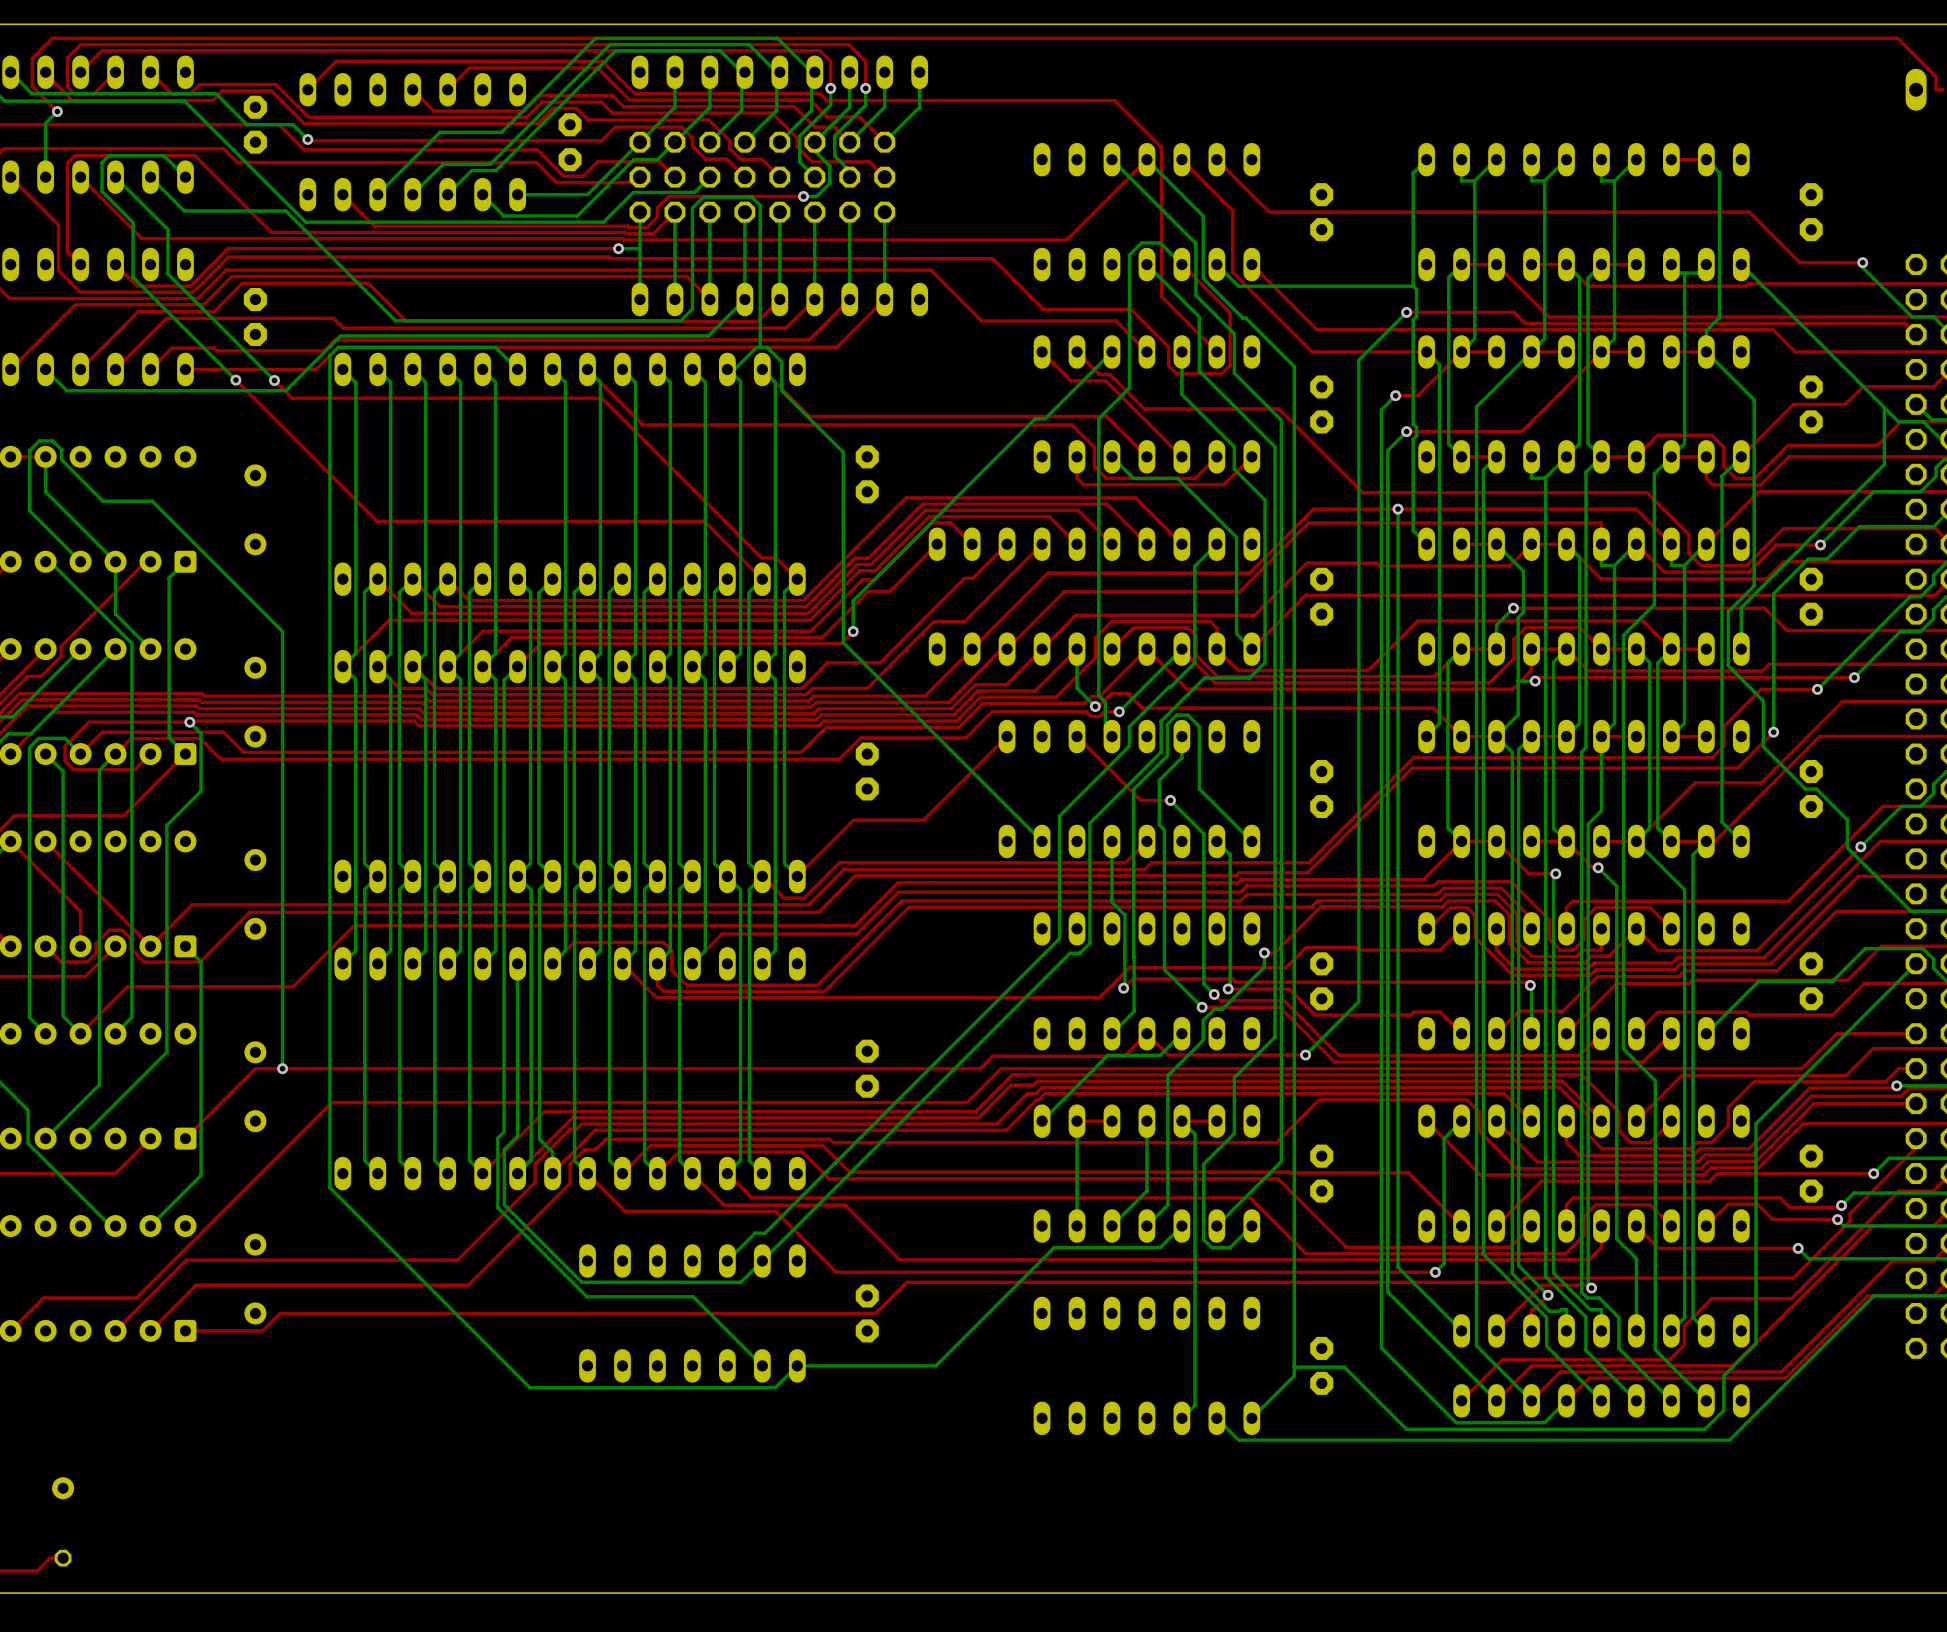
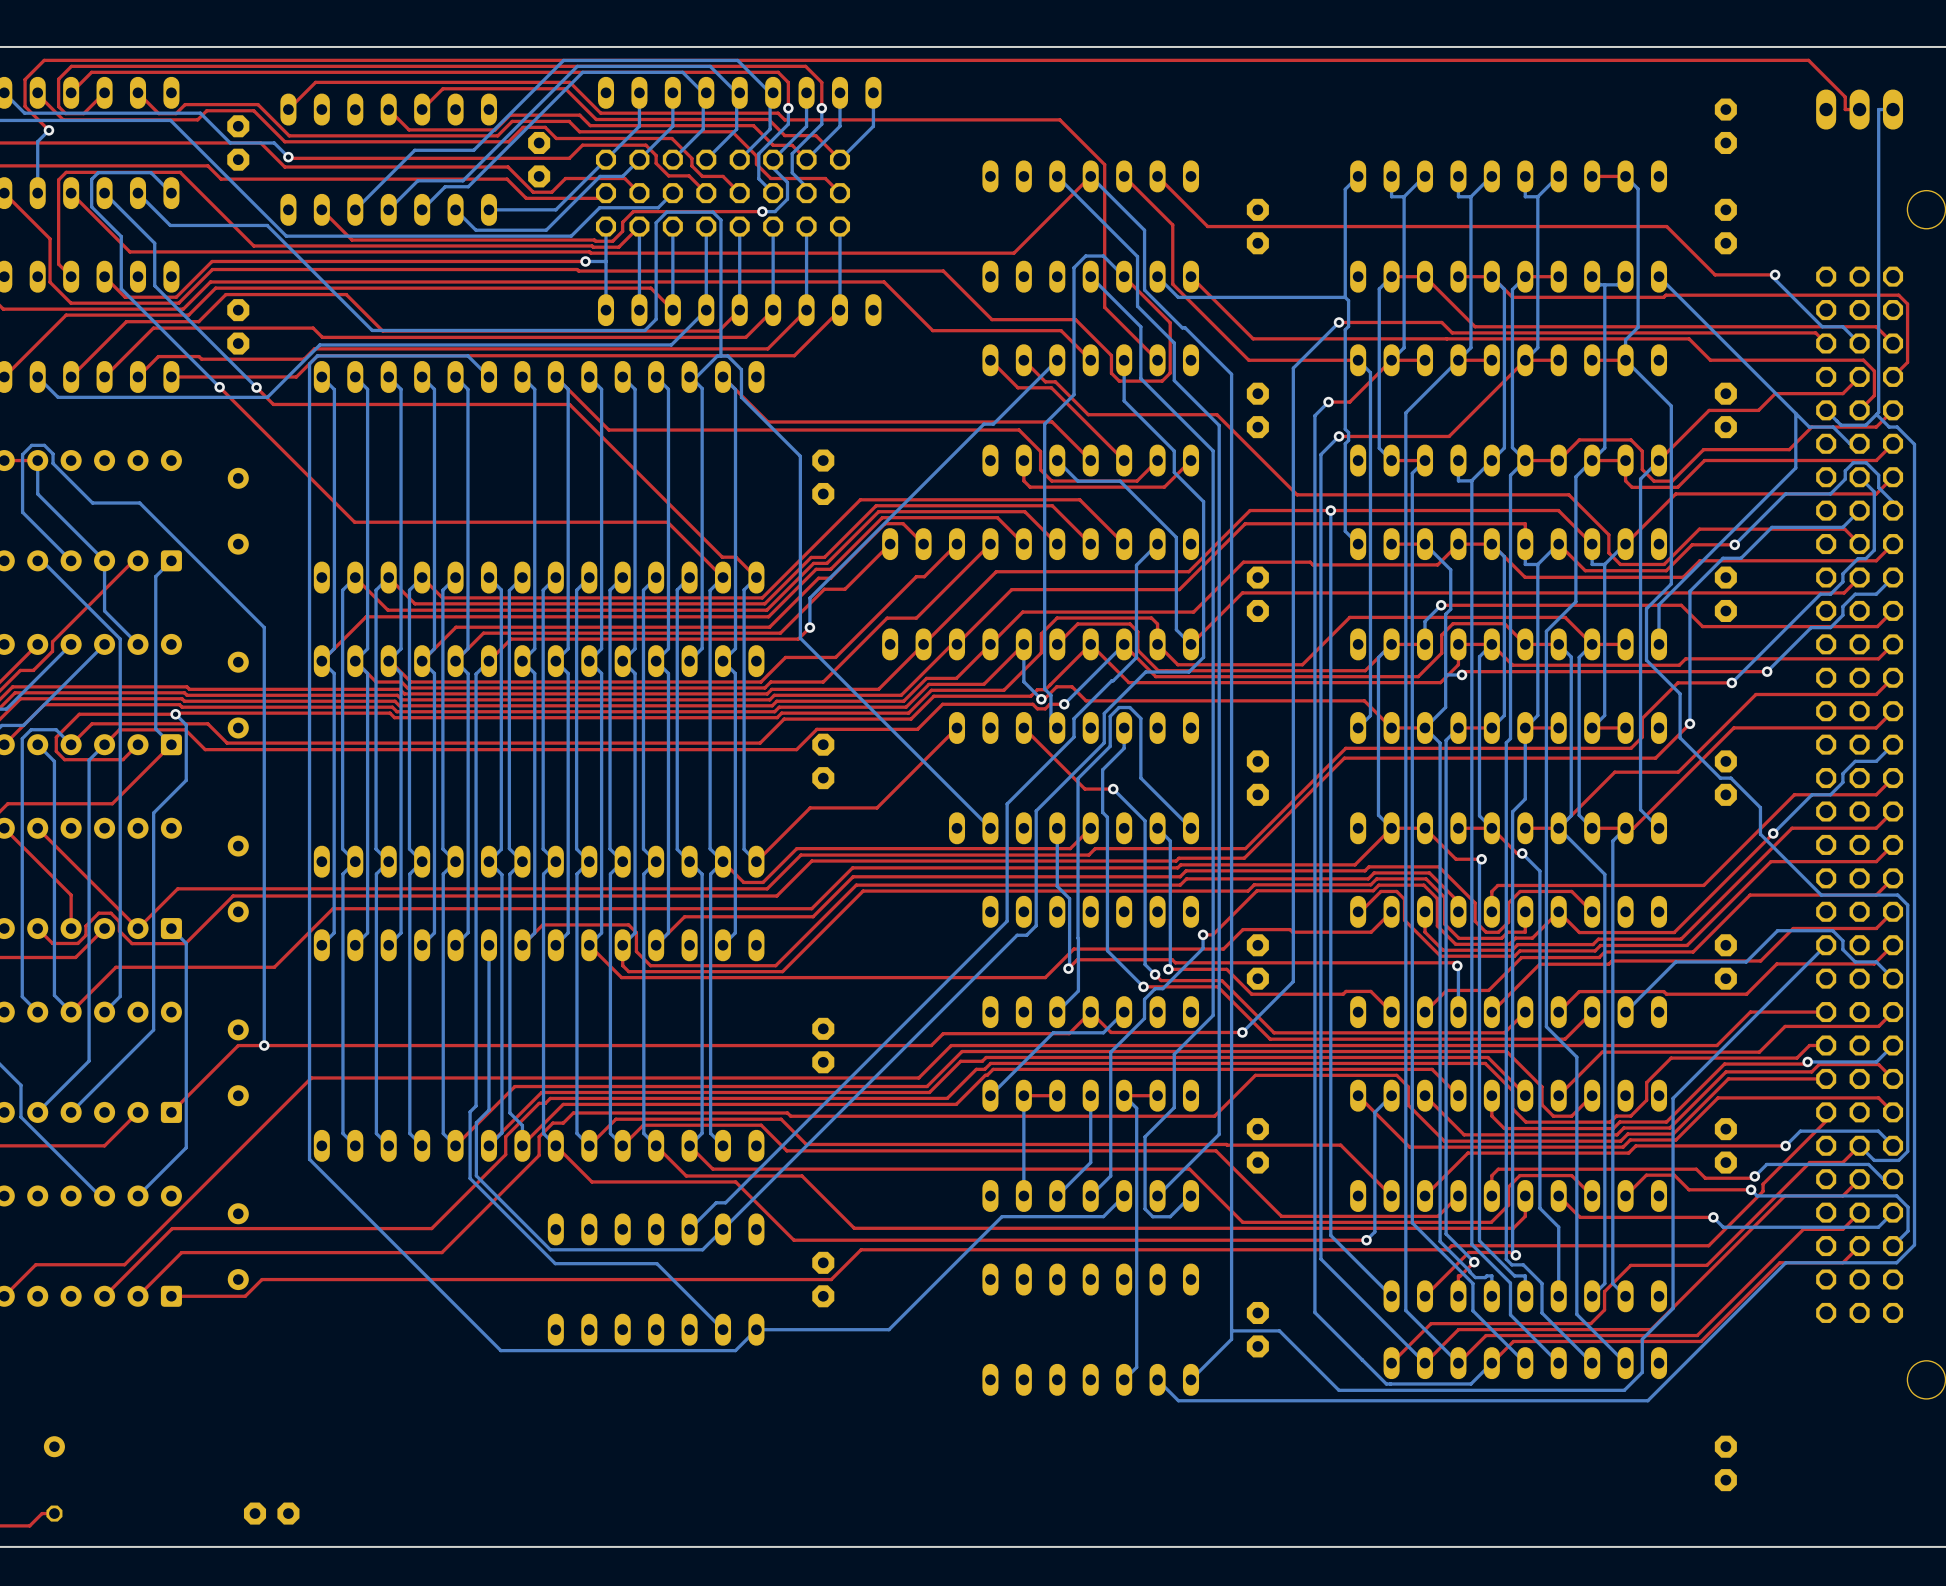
part: none -> (1725, 126)
part: none -> (1725, 1463)
part: none -> (271, 1513)

